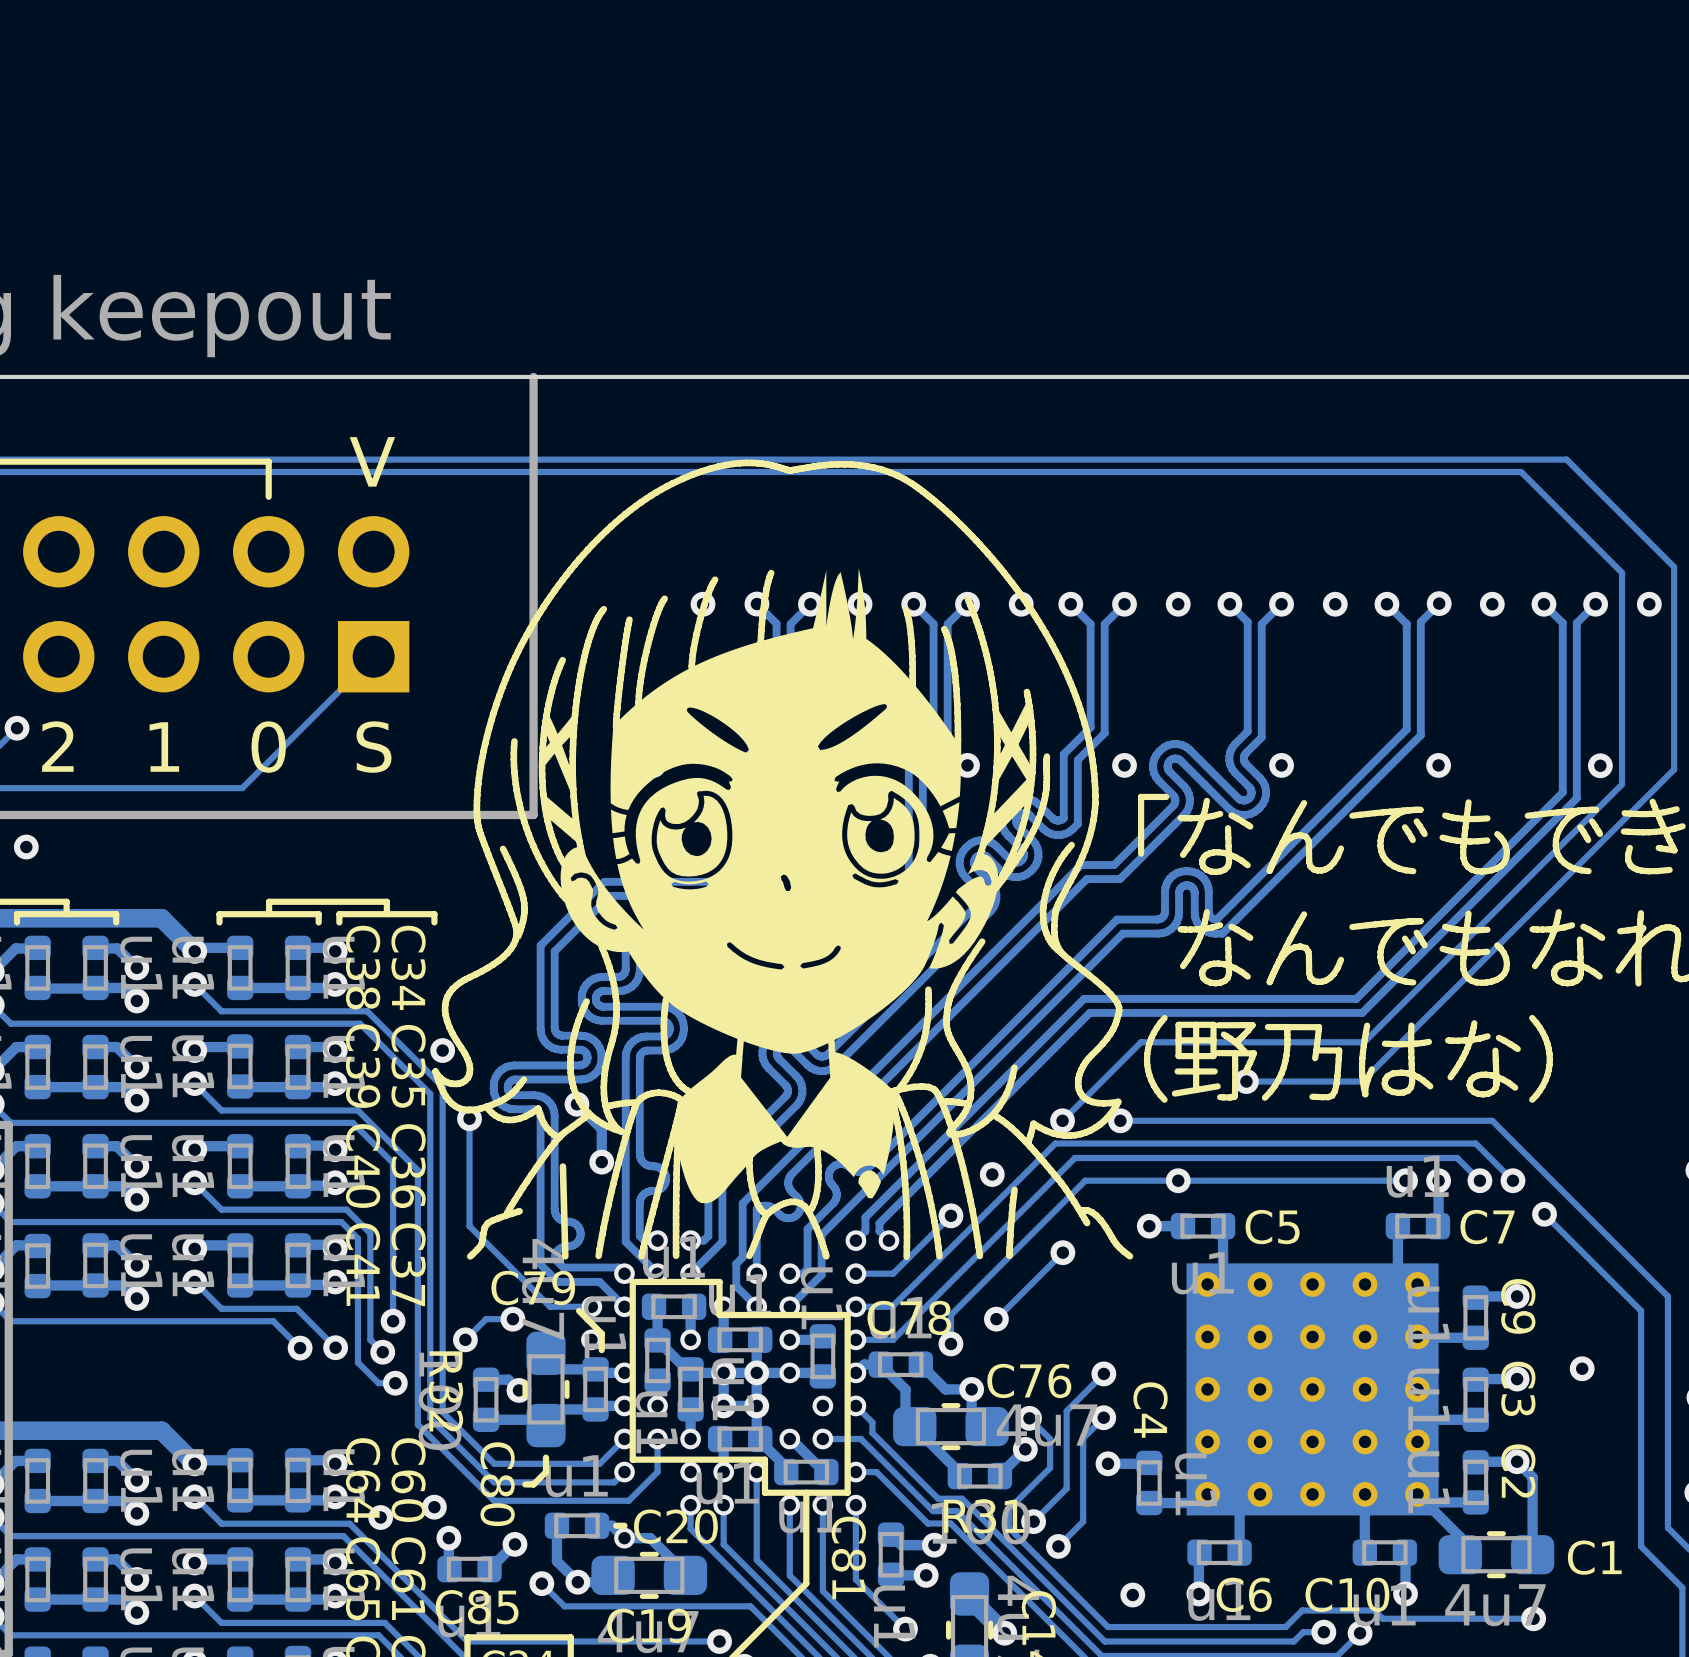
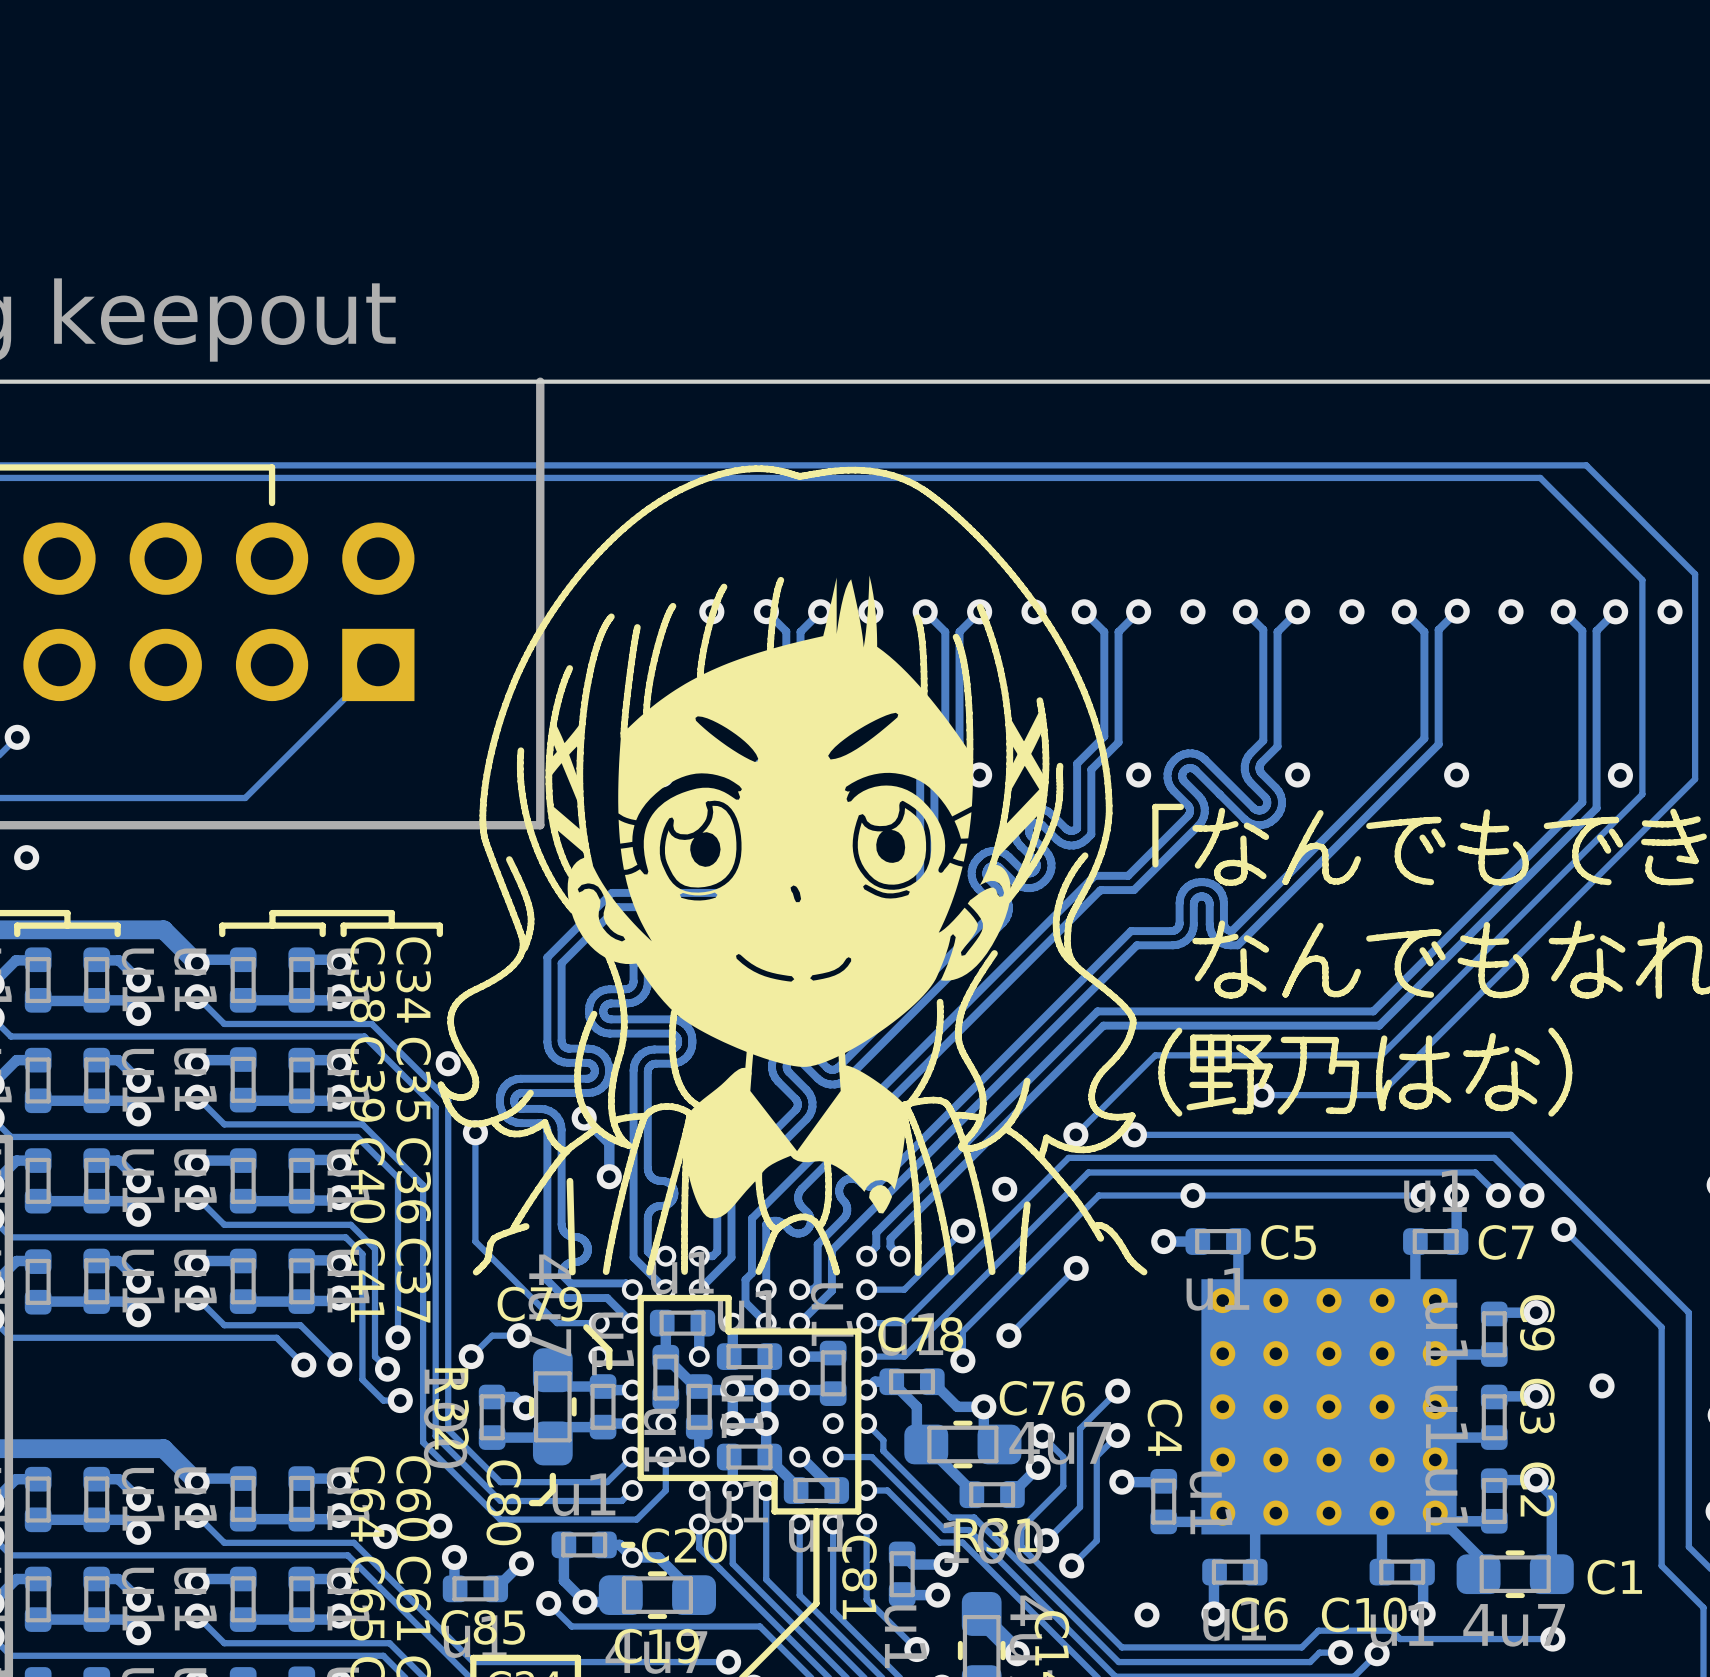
text: V (372, 461) -> none
text: 2 (57, 746) -> none
text: 1 (164, 747) -> none
text: 0 (268, 747) -> none
text: S (374, 747) -> none

